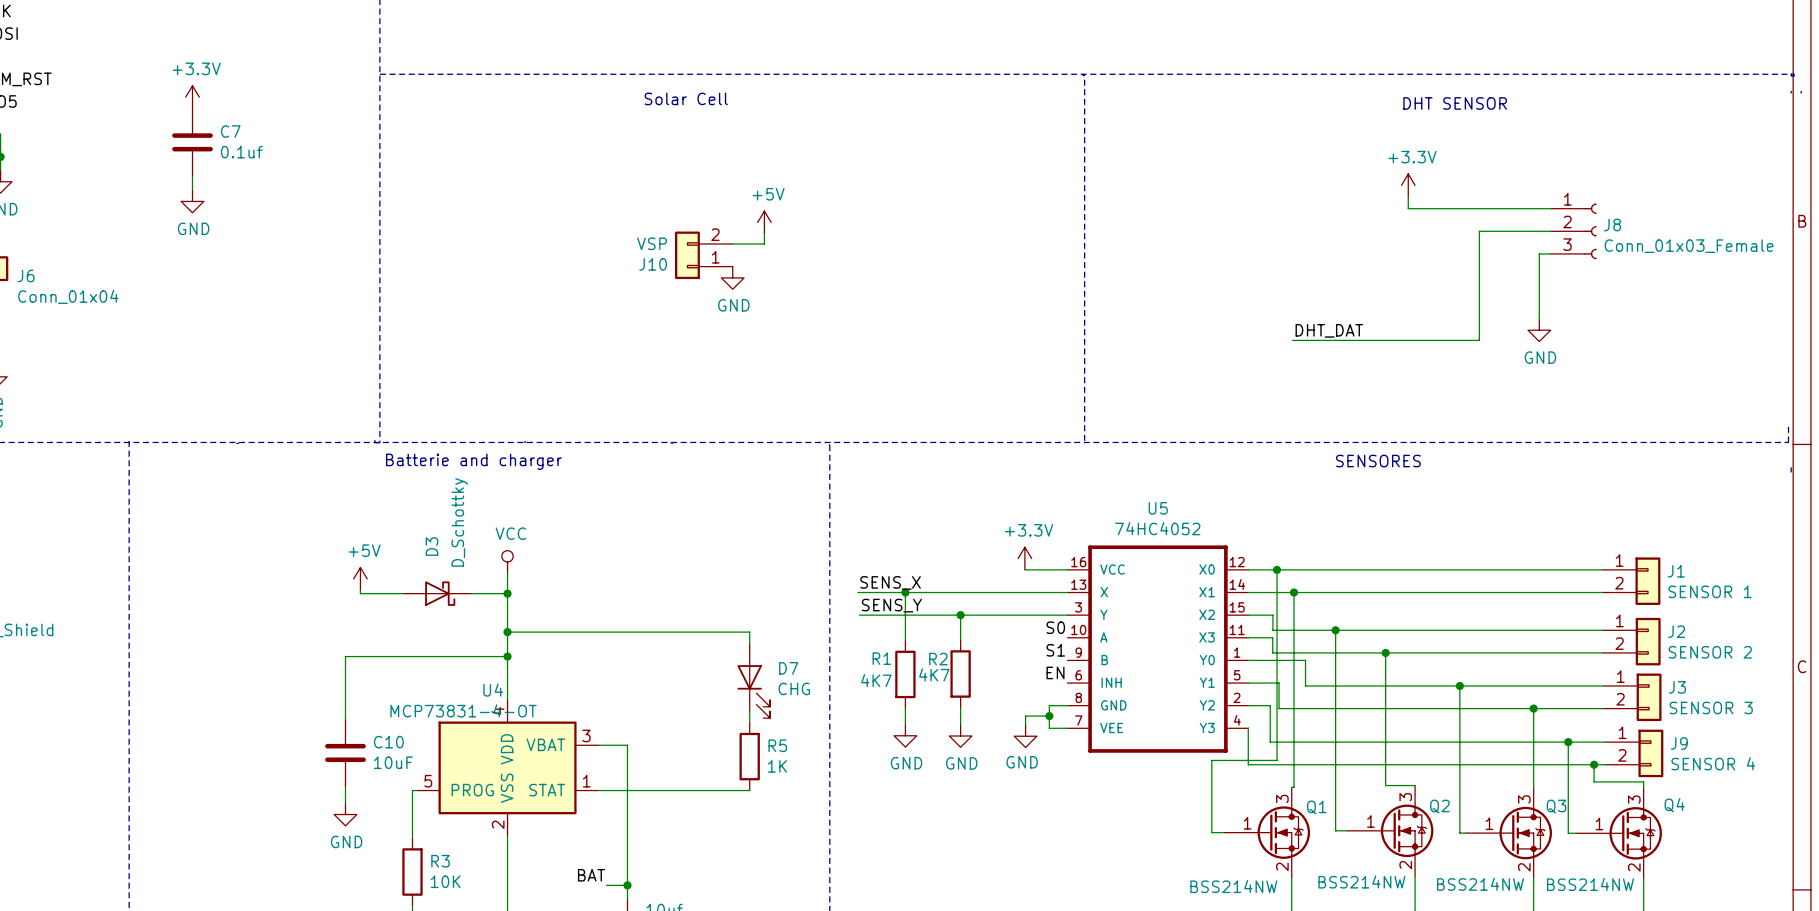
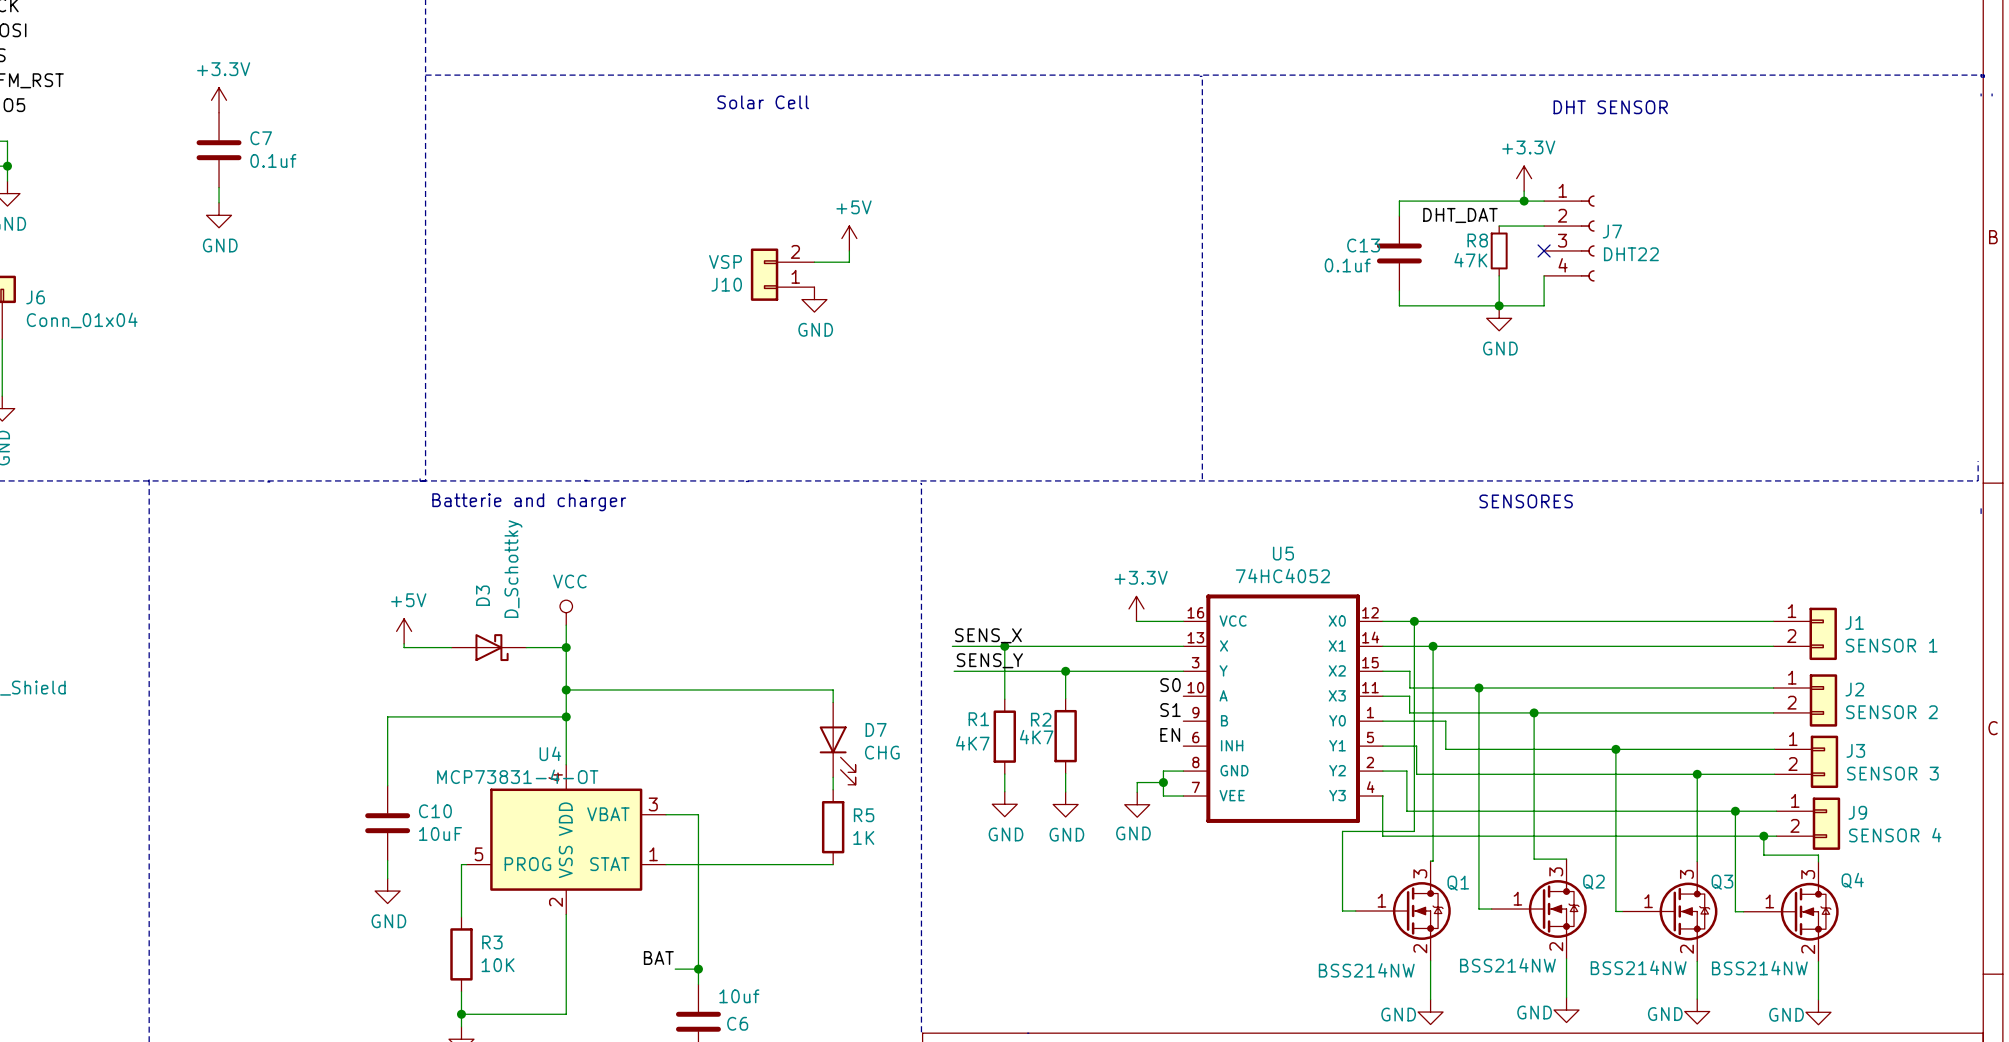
wire: none -> (1524, 191) (1524, 201)
power symbol position: +3.3V (1408, 185) -> +3.3V (1524, 178)
junction: none -> (1524, 201)
wire: none -> (1544, 201) (1399, 201) (1399, 216)
wire: (1408, 196) (1408, 208) (1550, 208) -> none
wire: none -> (1499, 226) (1544, 226)
J7: none -> DHT22 (1569, 238)
wire: (1550, 231) (1479, 231) (1479, 340) (1292, 340) -> none
J8: Conn_01x03_Female (1573, 231) -> none
R8: none -> 47K (1499, 250)
no-connect mark: none -> (1544, 250)
C13: none -> 0.1uf (1399, 253)
wire: (1550, 253) (1539, 253) (1539, 318) -> none
wire: none -> (1499, 275) (1499, 305)
wire: none -> (1544, 275) (1544, 305) (1399, 305) (1399, 290)
junction: none -> (1499, 305)
label position: DHT_DAT (1329, 330) -> DHT_DAT (1460, 215)
power symbol position: GND (1539, 330) -> GND (1499, 318)

